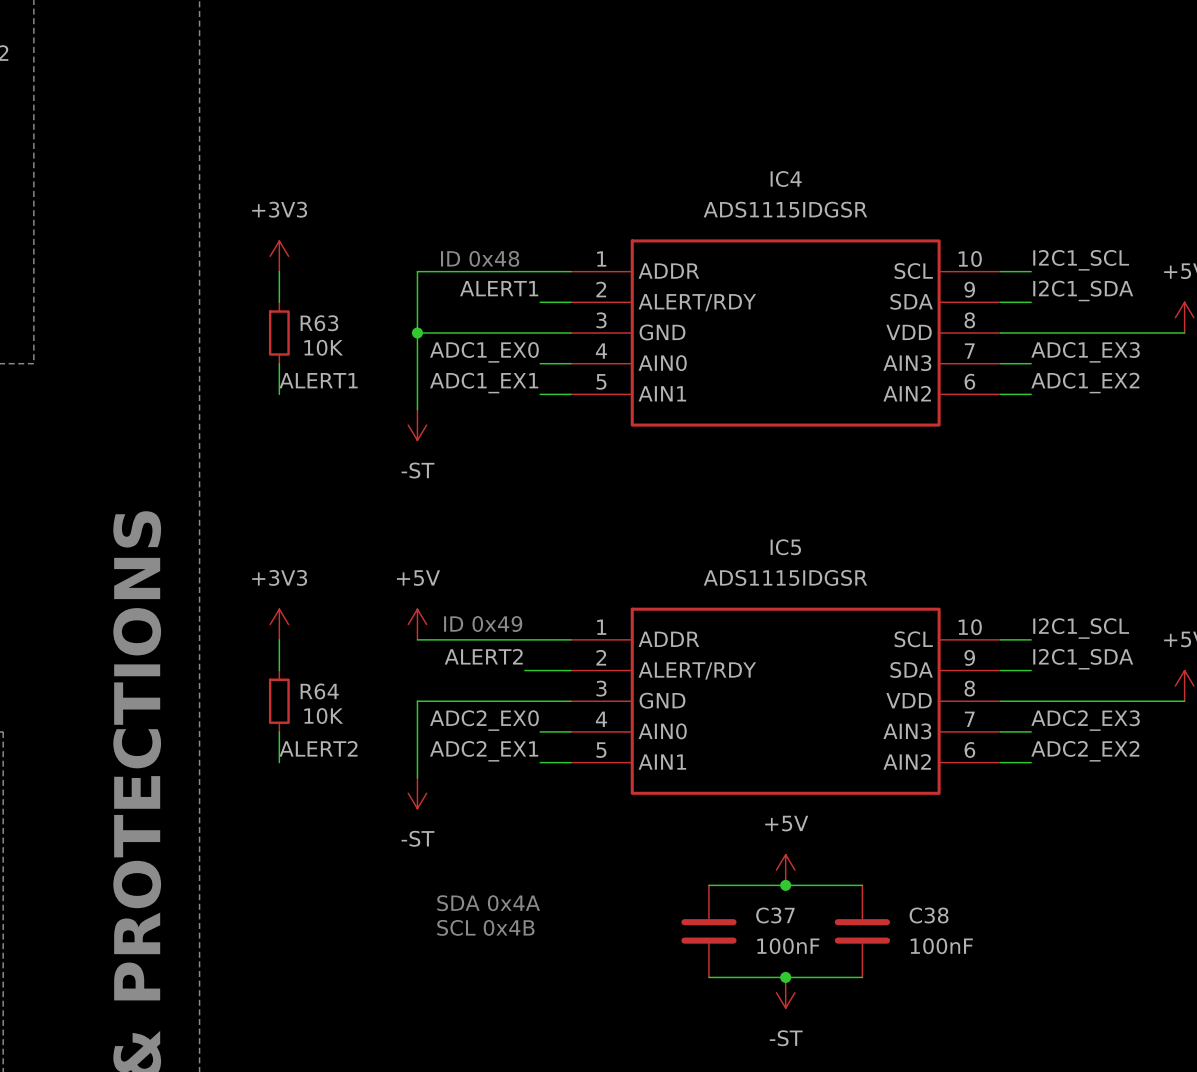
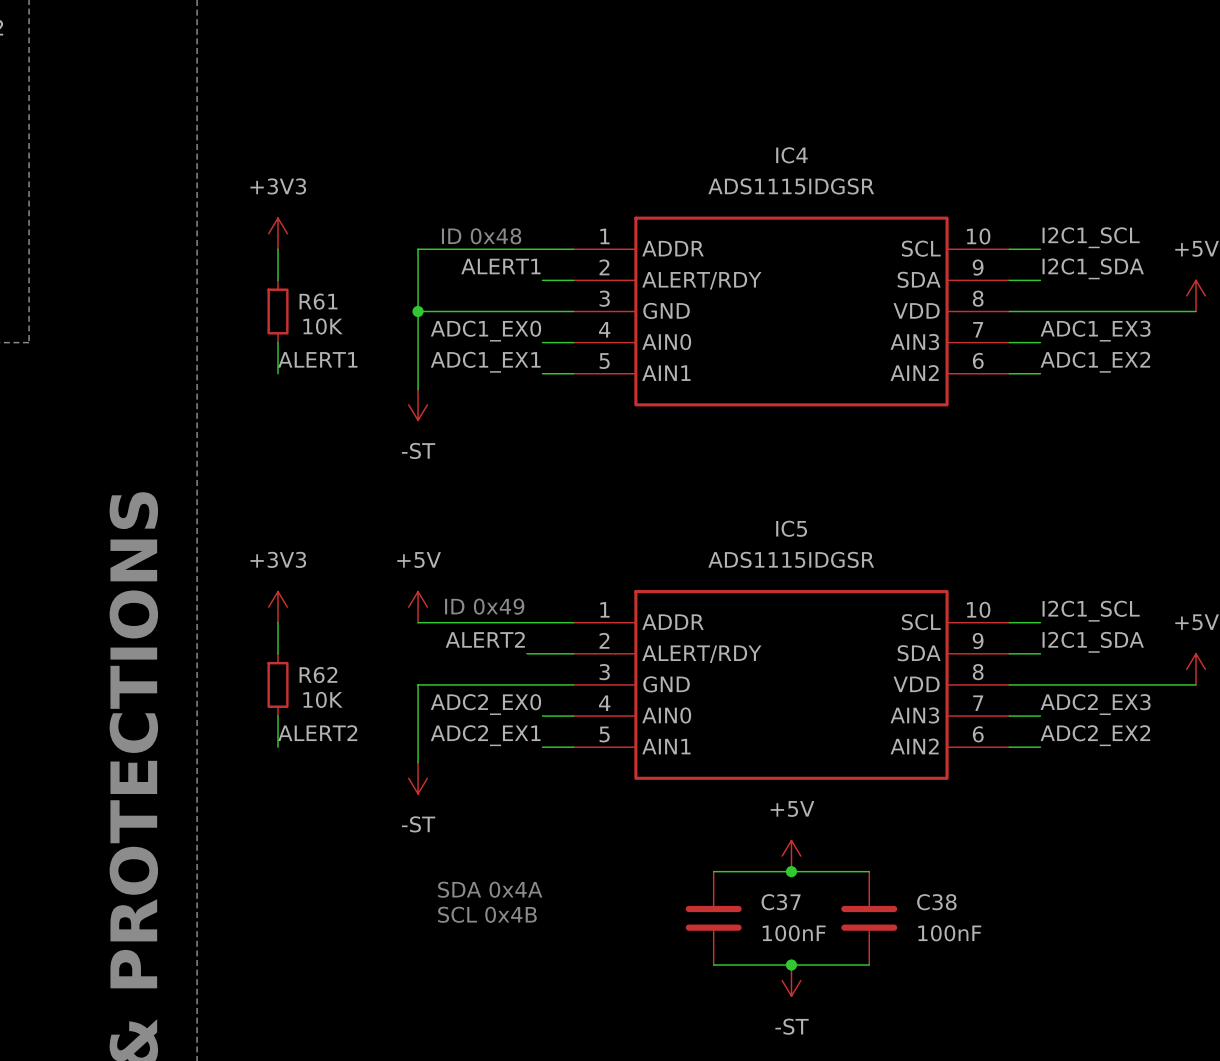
R63 name: R63 (319, 323) -> R61 (318, 301)
R64 name: R64 (319, 691) -> R62 (318, 675)

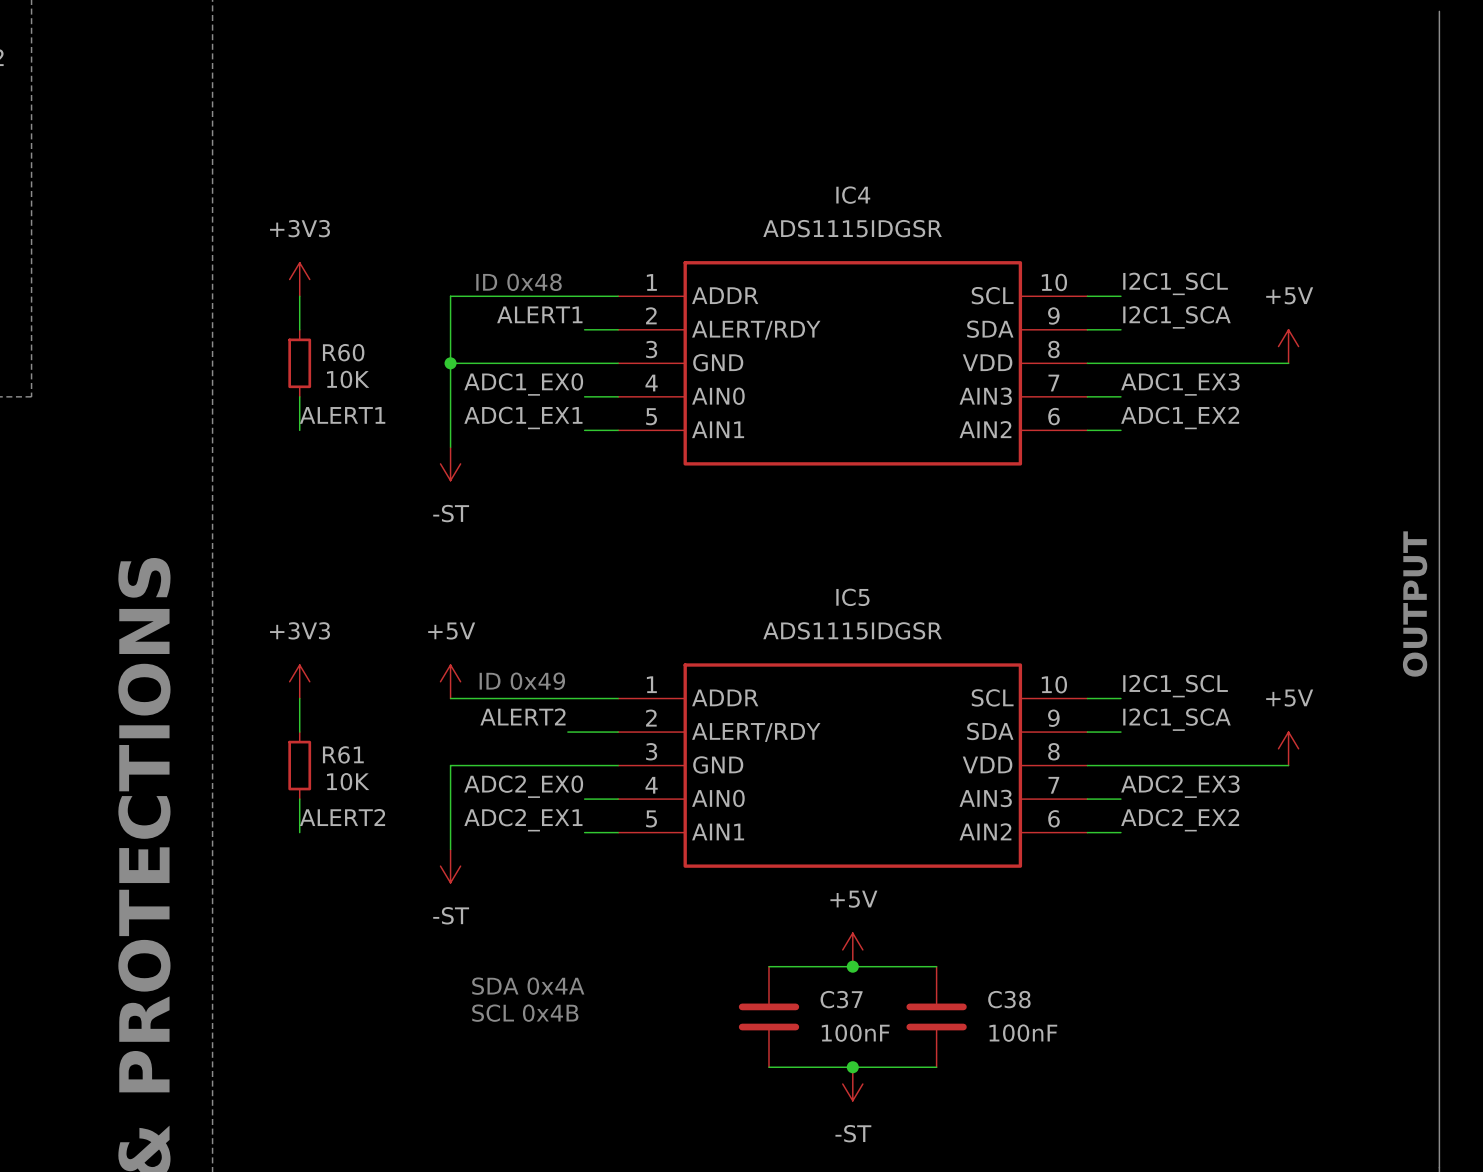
label: I2C1_SDA (1093, 268) -> I2C1_SCA (1176, 317)
R61 name: R61 (318, 301) -> R60 (343, 352)
label: I2C1_SDA (1093, 642) -> I2C1_SCA (1176, 719)
R62 name: R62 (318, 675) -> R61 (343, 754)

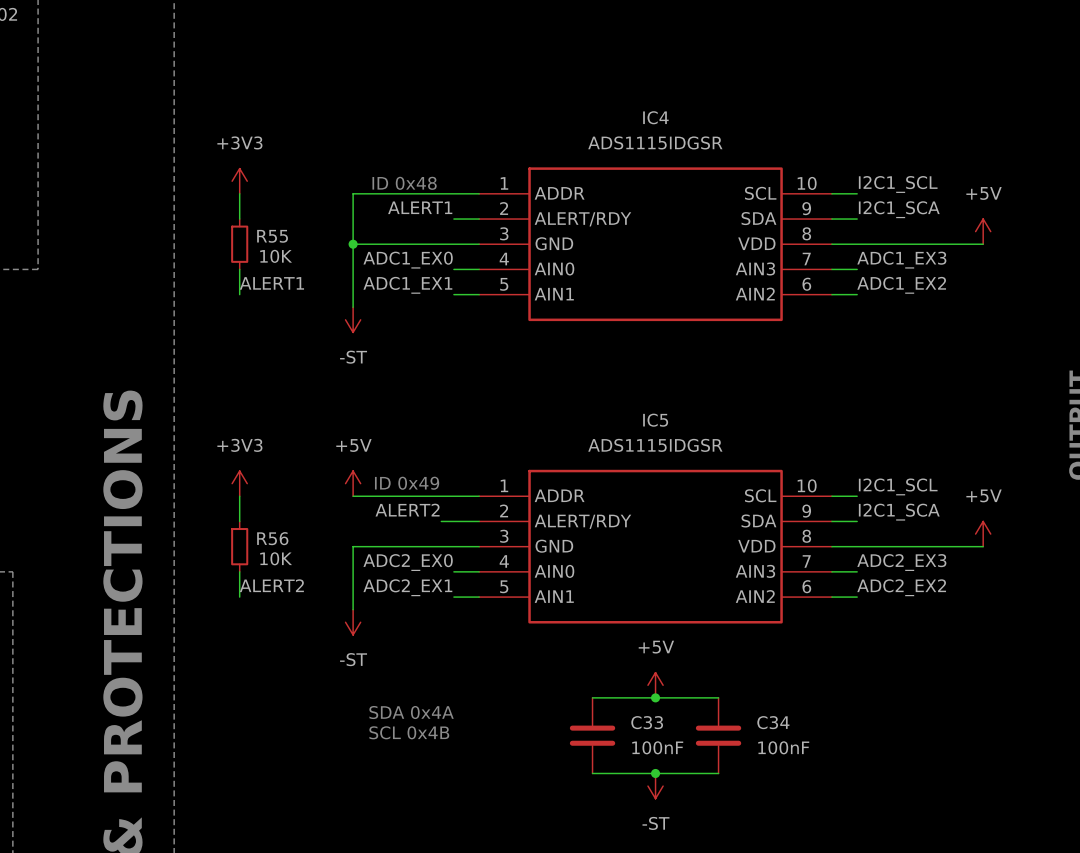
R60 name: R60 (343, 352) -> R55 (272, 236)
R61 name: R61 (343, 754) -> R56 (272, 538)
C37 name: C37 (841, 999) -> C33 (647, 722)
C38 name: C38 (1009, 999) -> C34 (773, 722)

